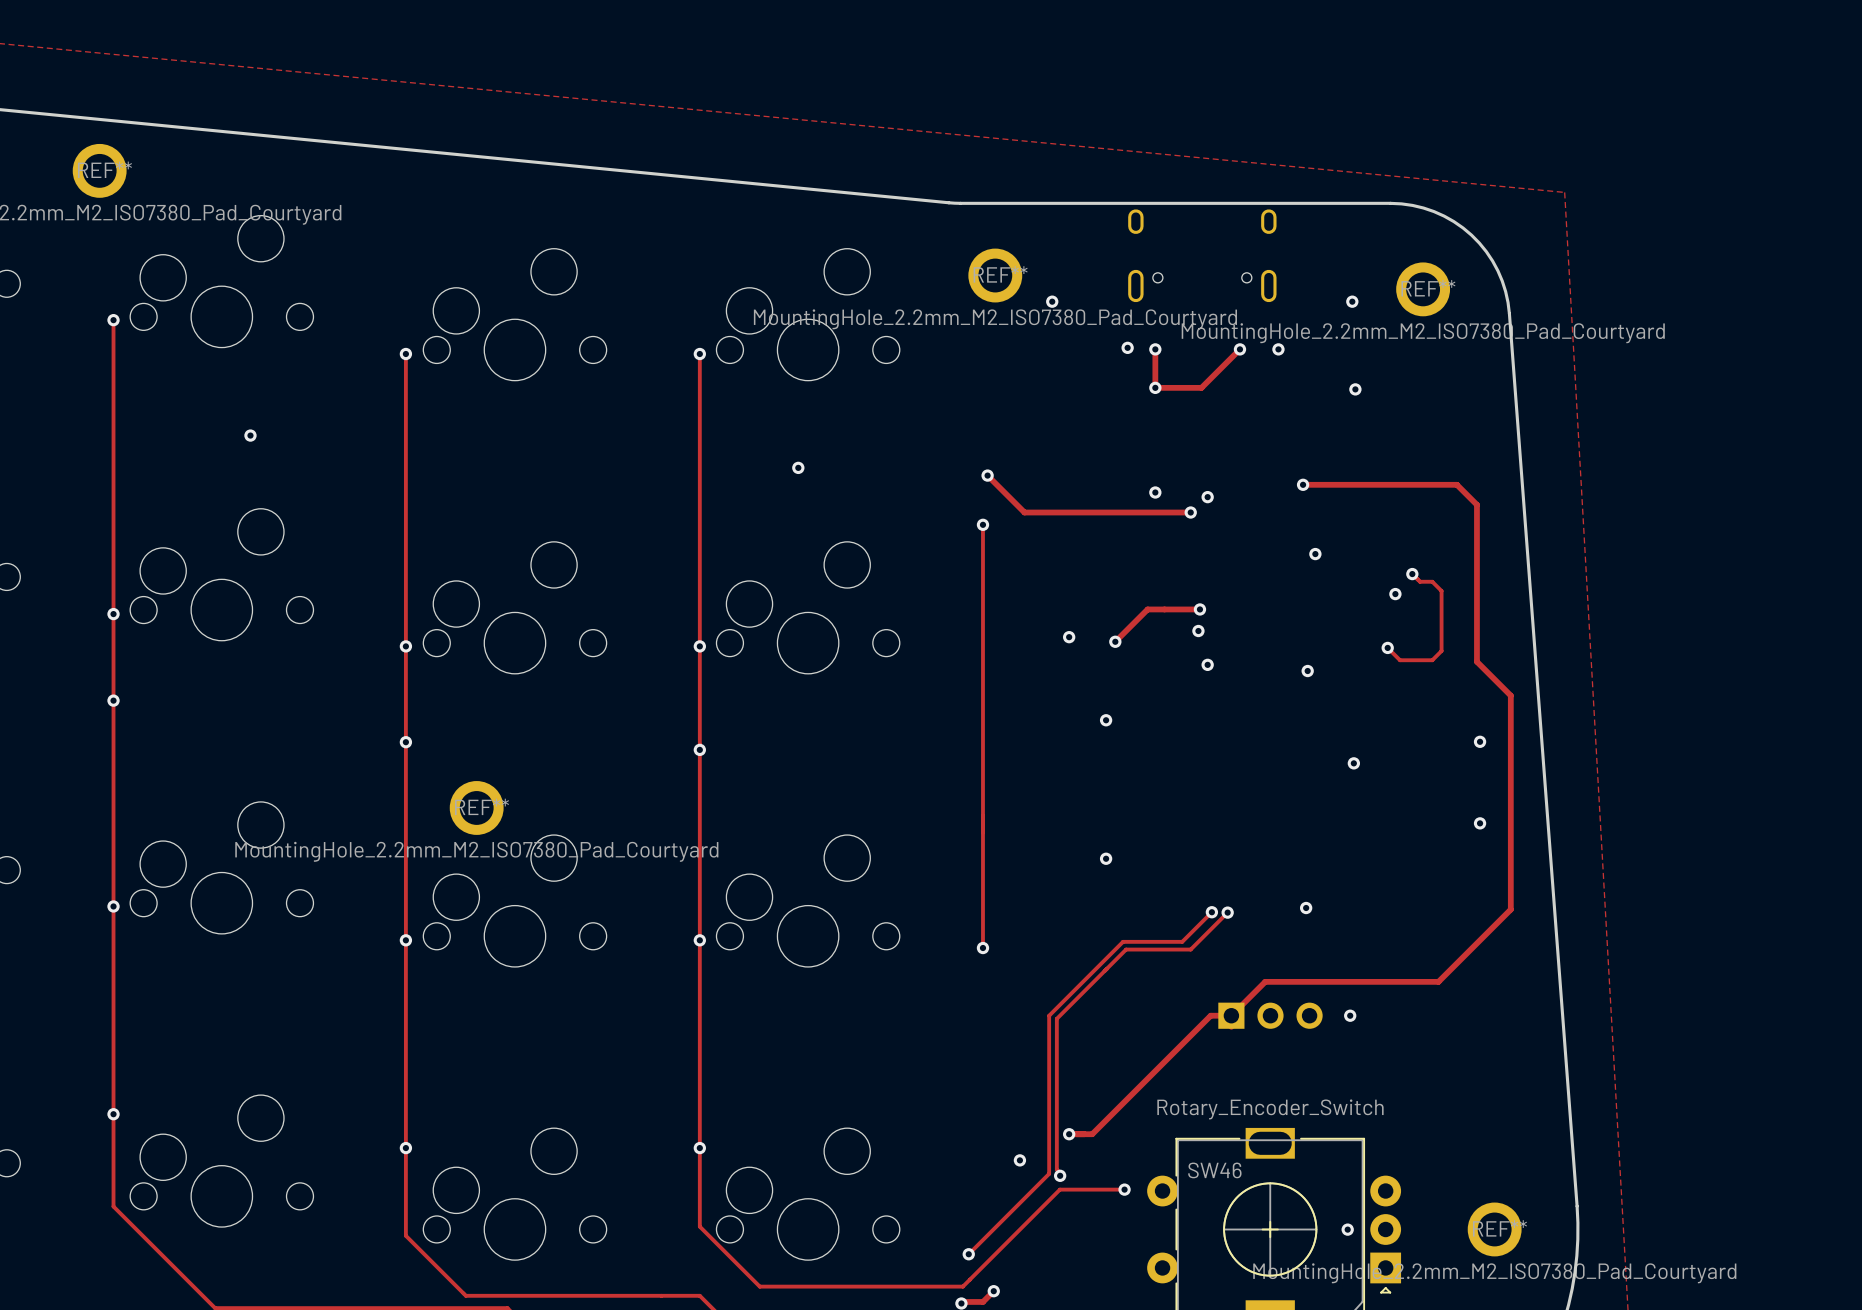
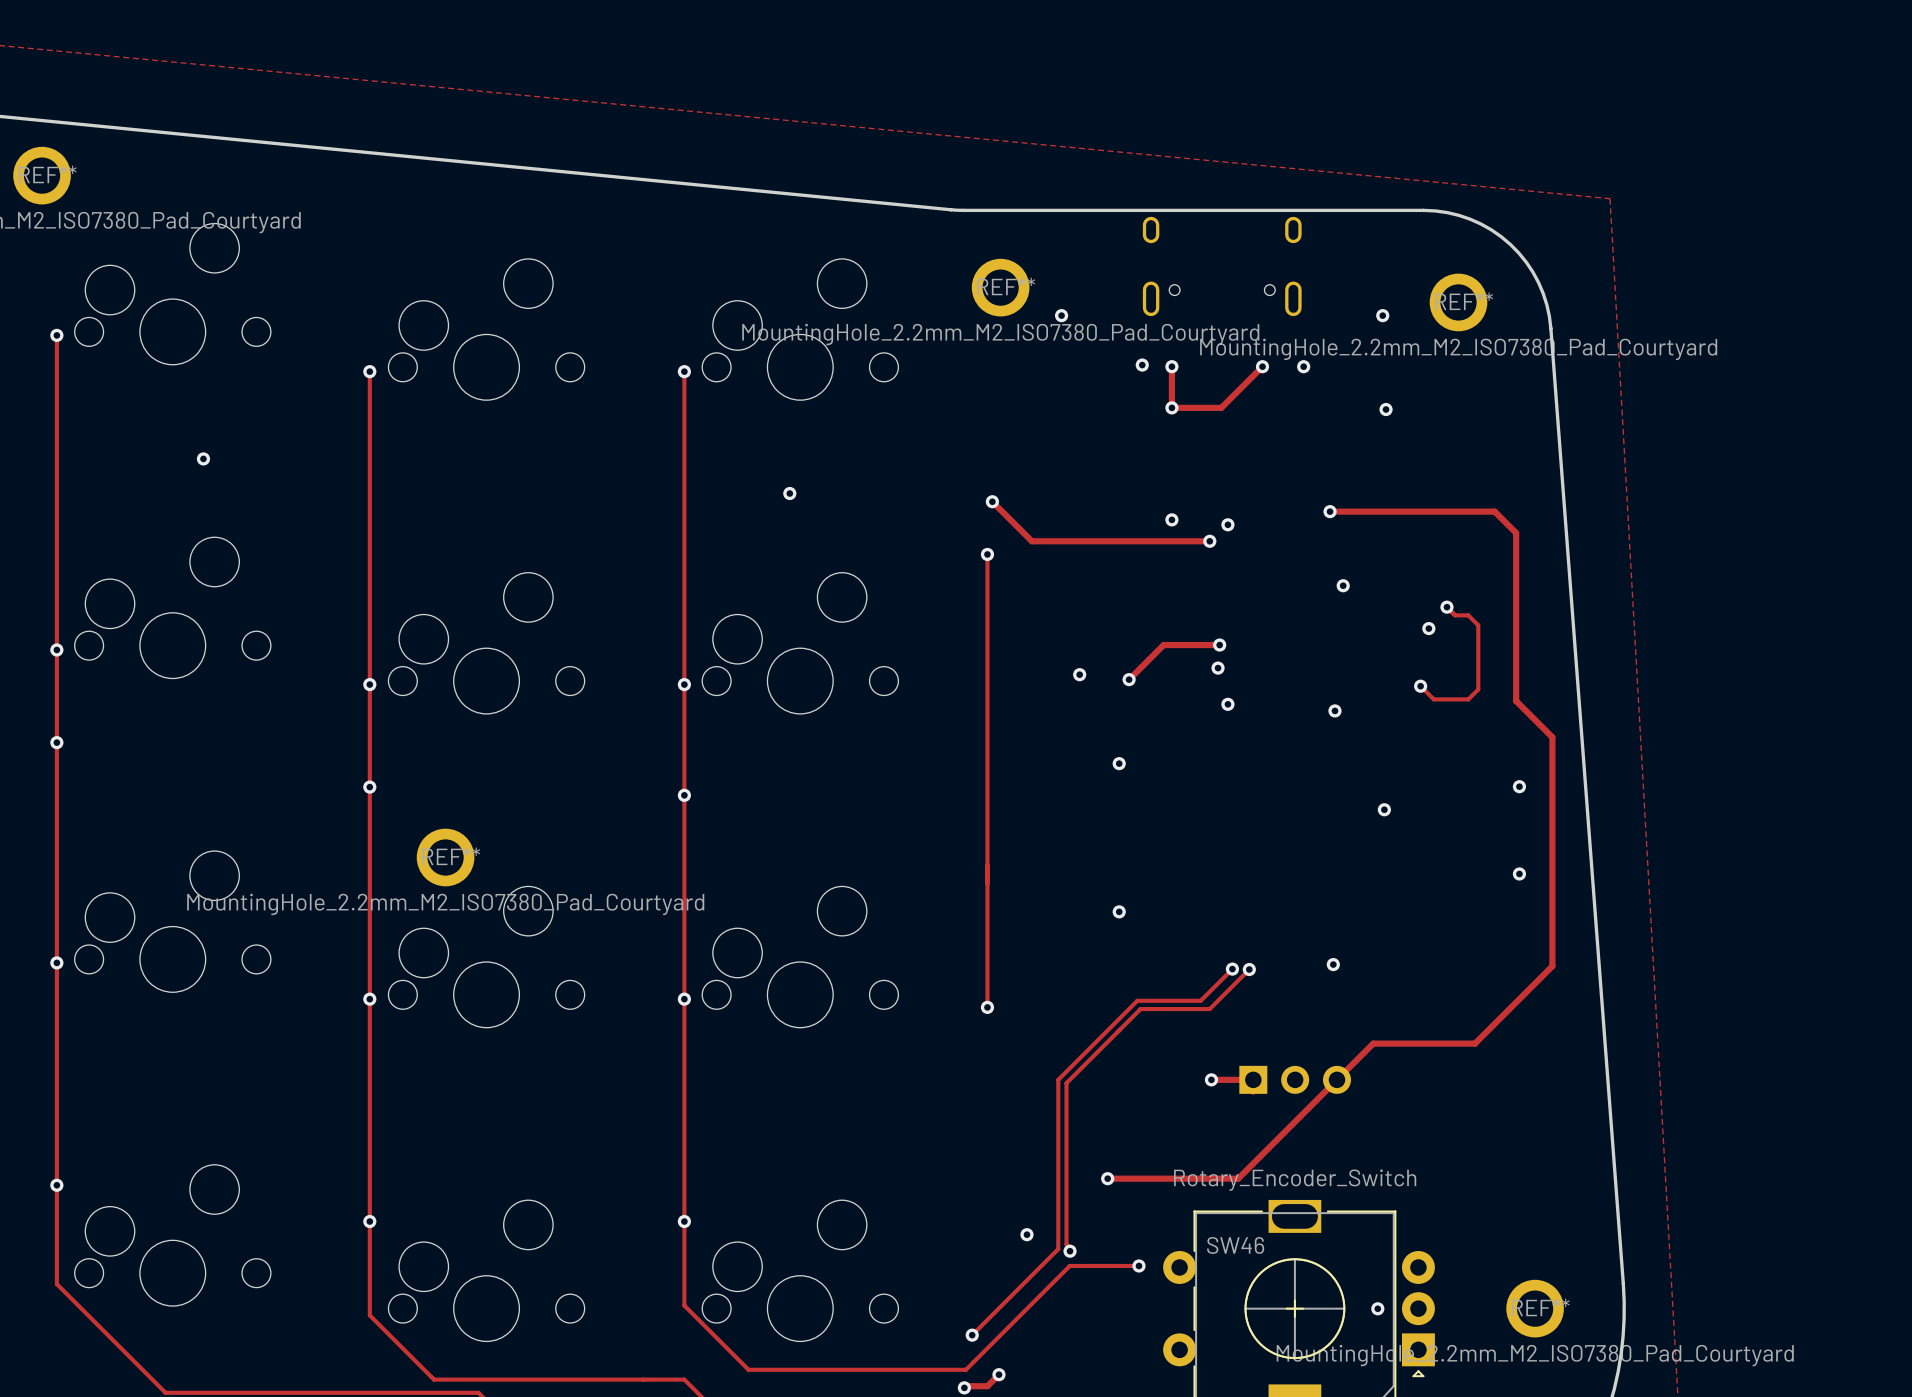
track: (1343, 981) (1265, 981) (1231, 1015) -> (1373, 1043) (1238, 1178) (1107, 1178)
via: none -> (1211, 1079)
track: (1210, 1015) (1092, 1134) (1069, 1134) -> (1231, 1079) (1211, 1079)
via: (1350, 1015) -> none
via position: (1069, 1134) -> (1107, 1178)

